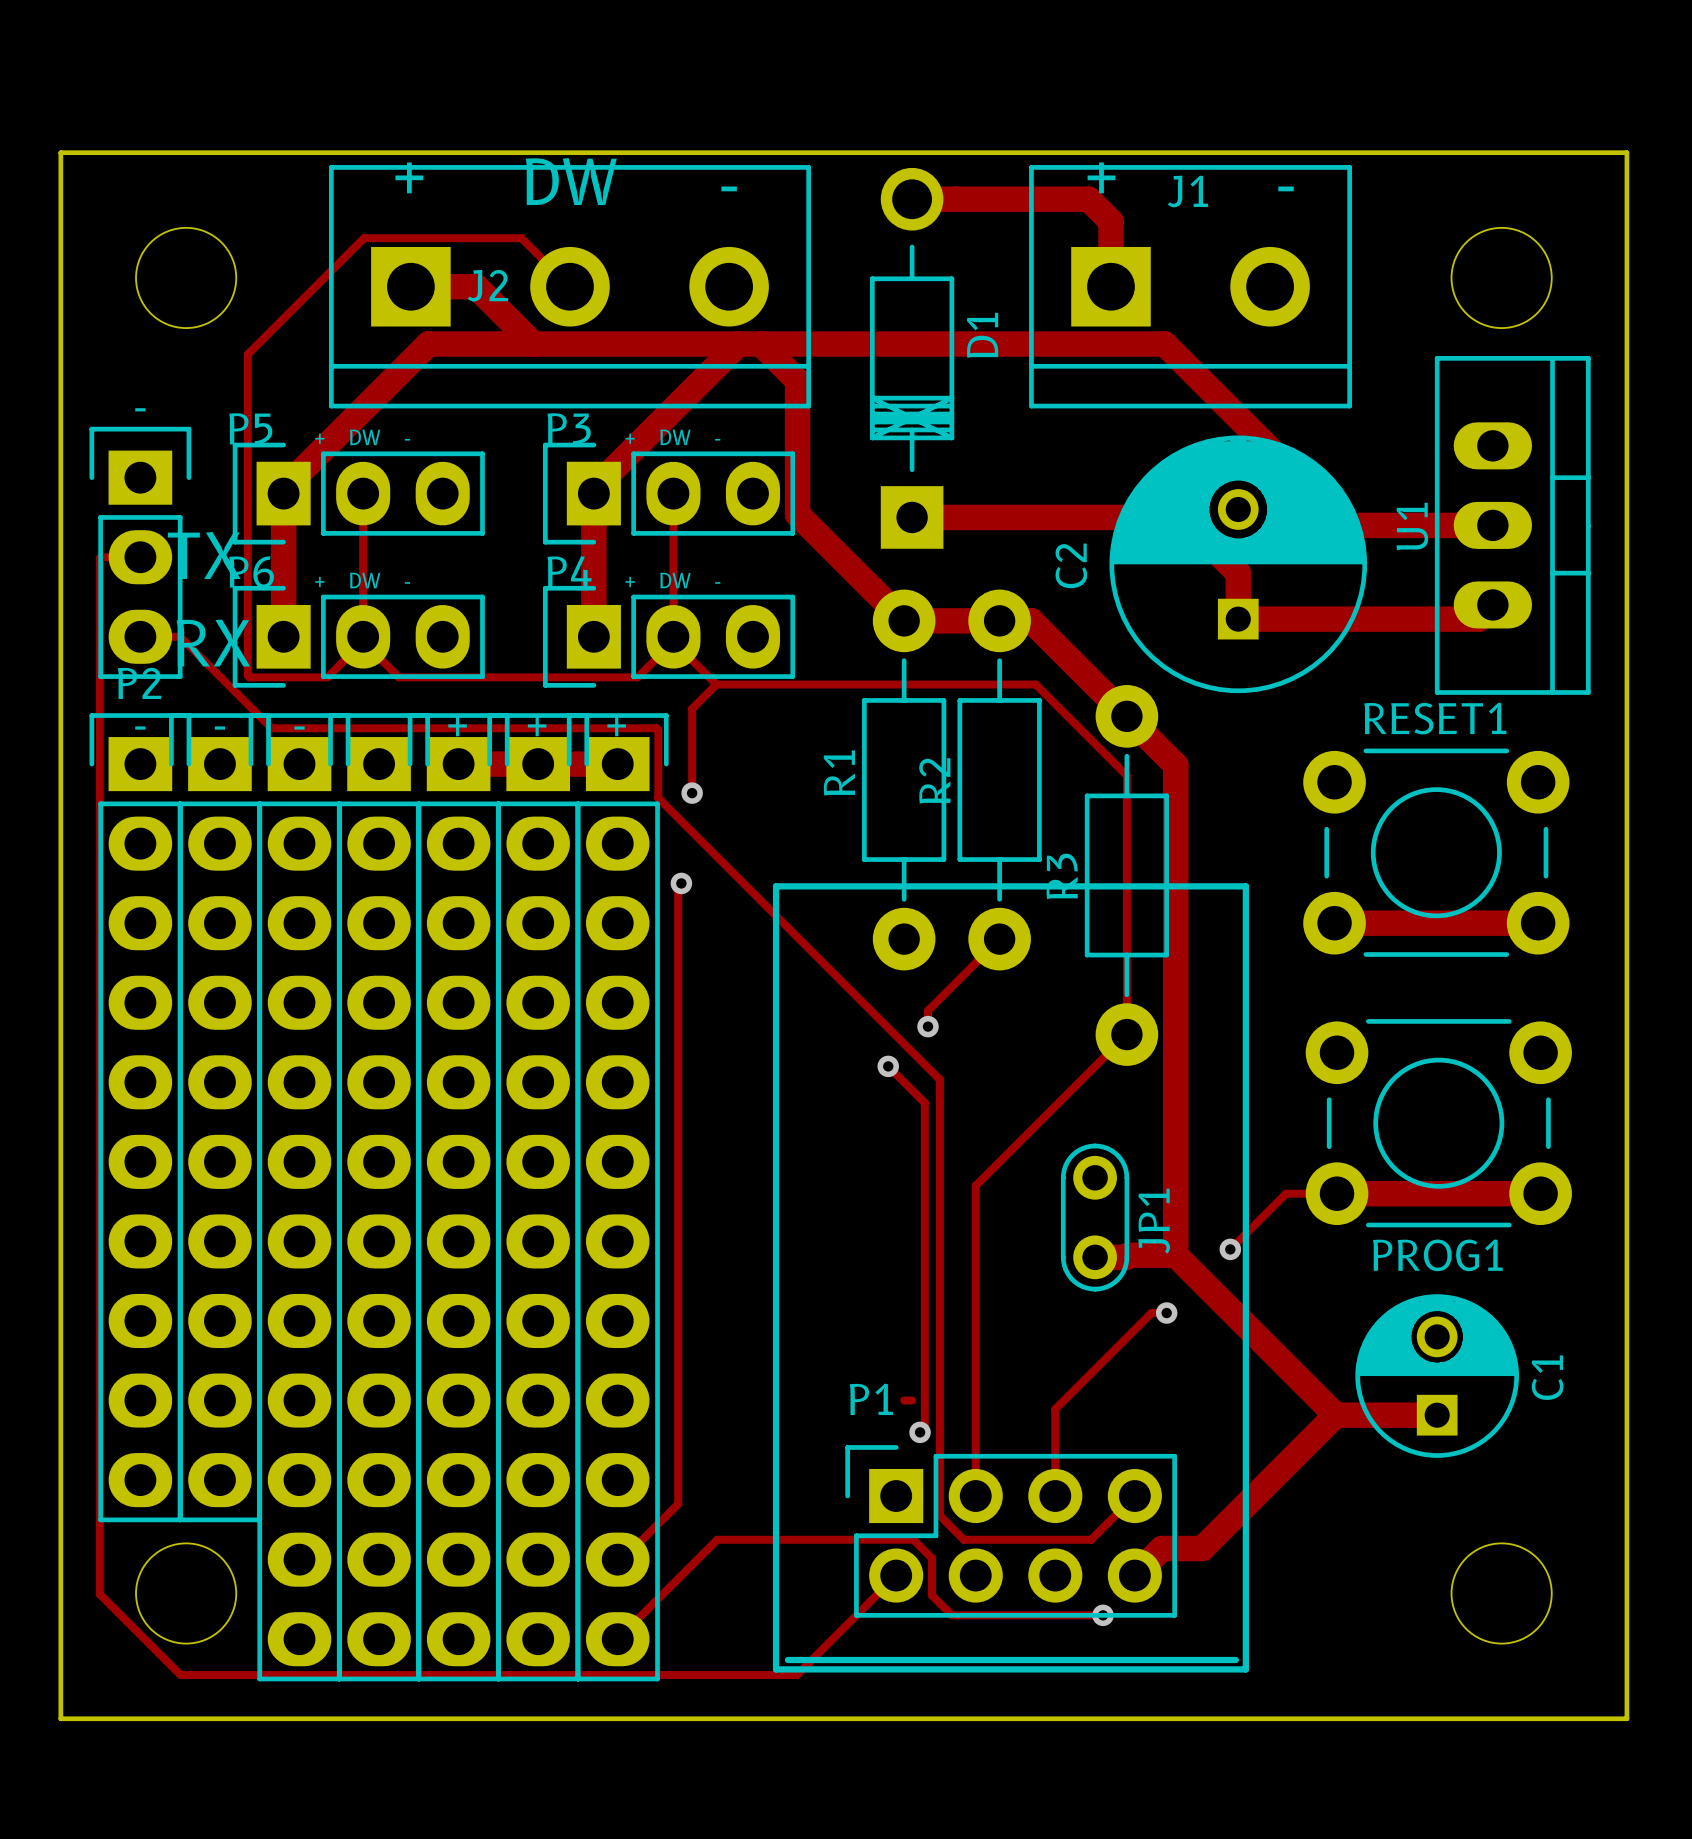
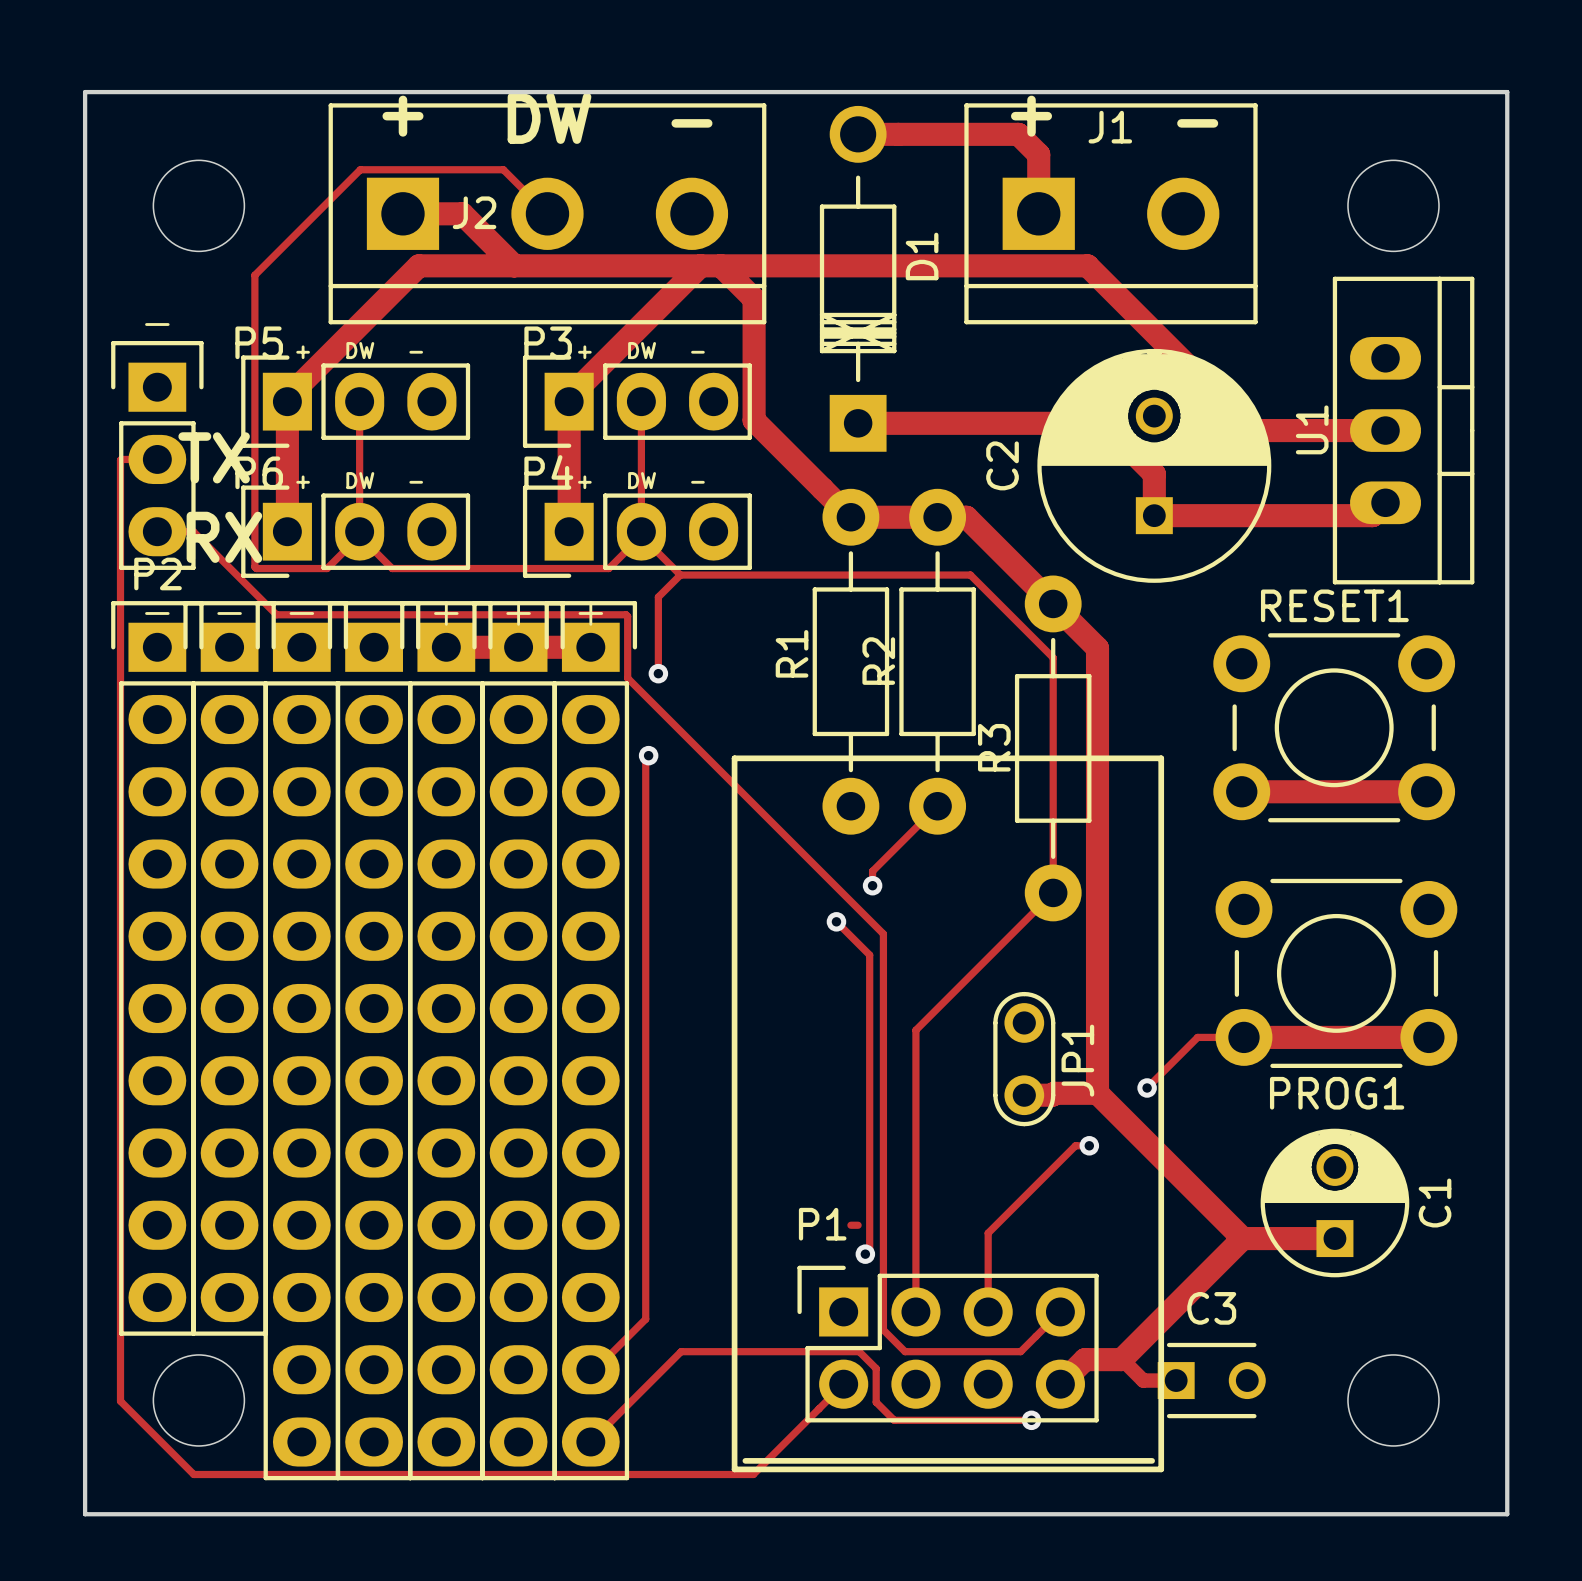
track: none -> (1121, 1359) (1143, 1380) (1176, 1380)
C3: none -> (1211, 1380)

